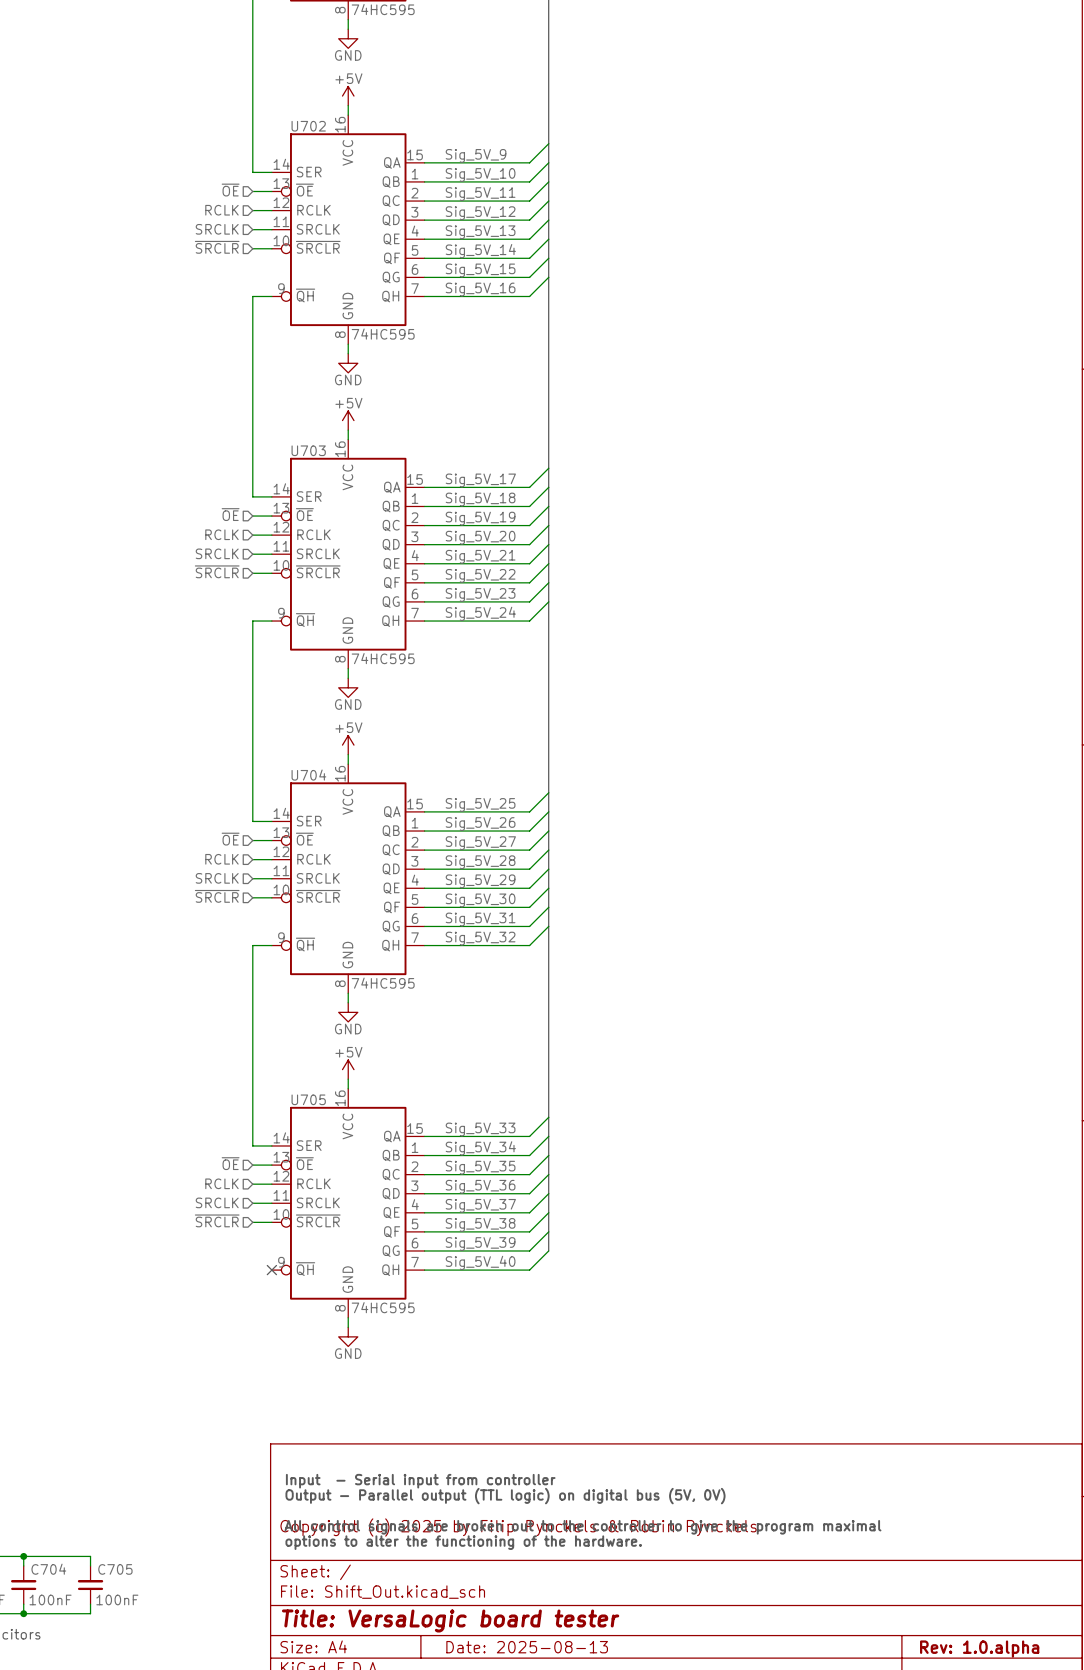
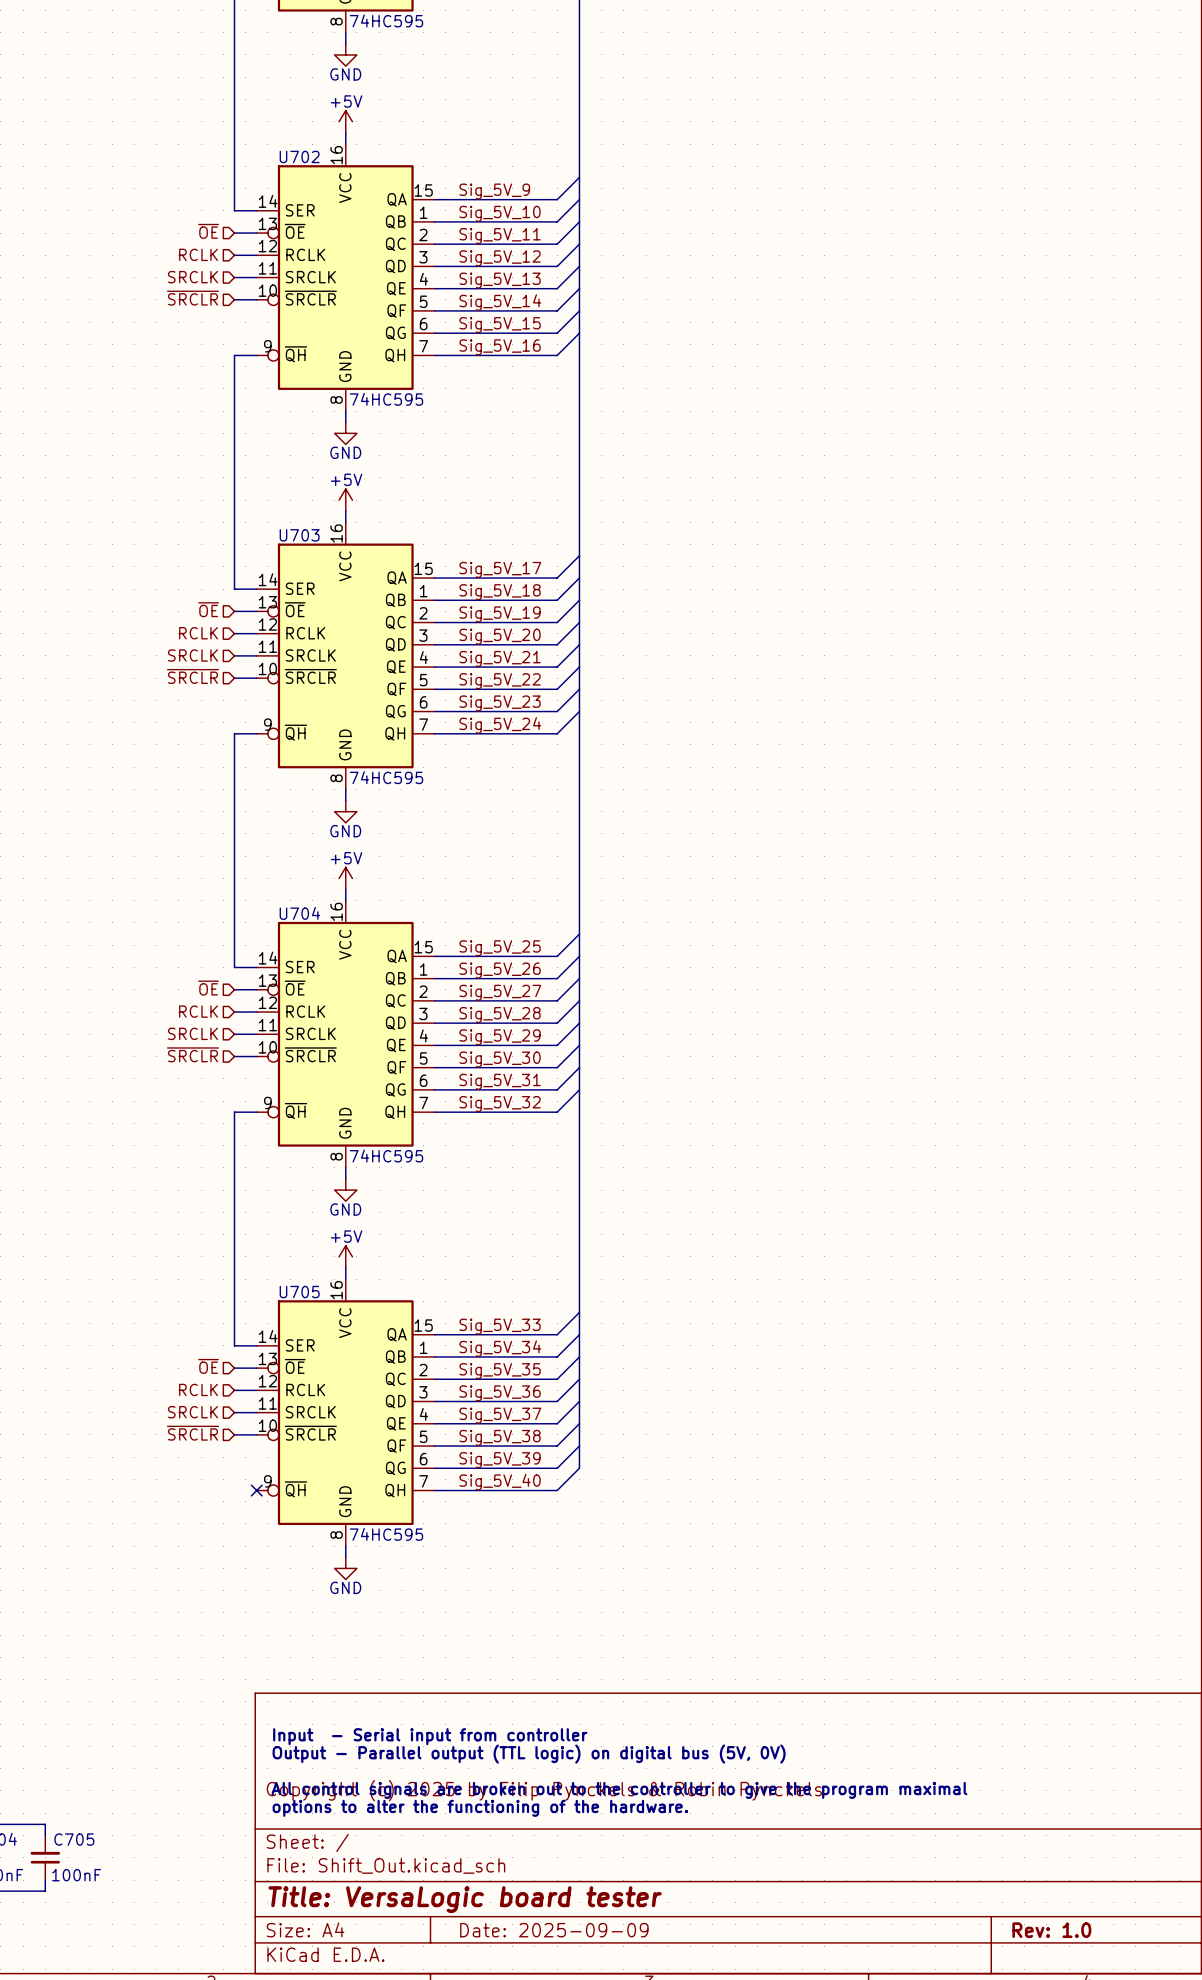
title block: Date: 2025-08-13 (527, 1647) -> Date: 2025-09-09 (554, 1930)
title block: Rev: 1.0.alpha (979, 1649) -> Rev: 1.0 (1051, 1930)

